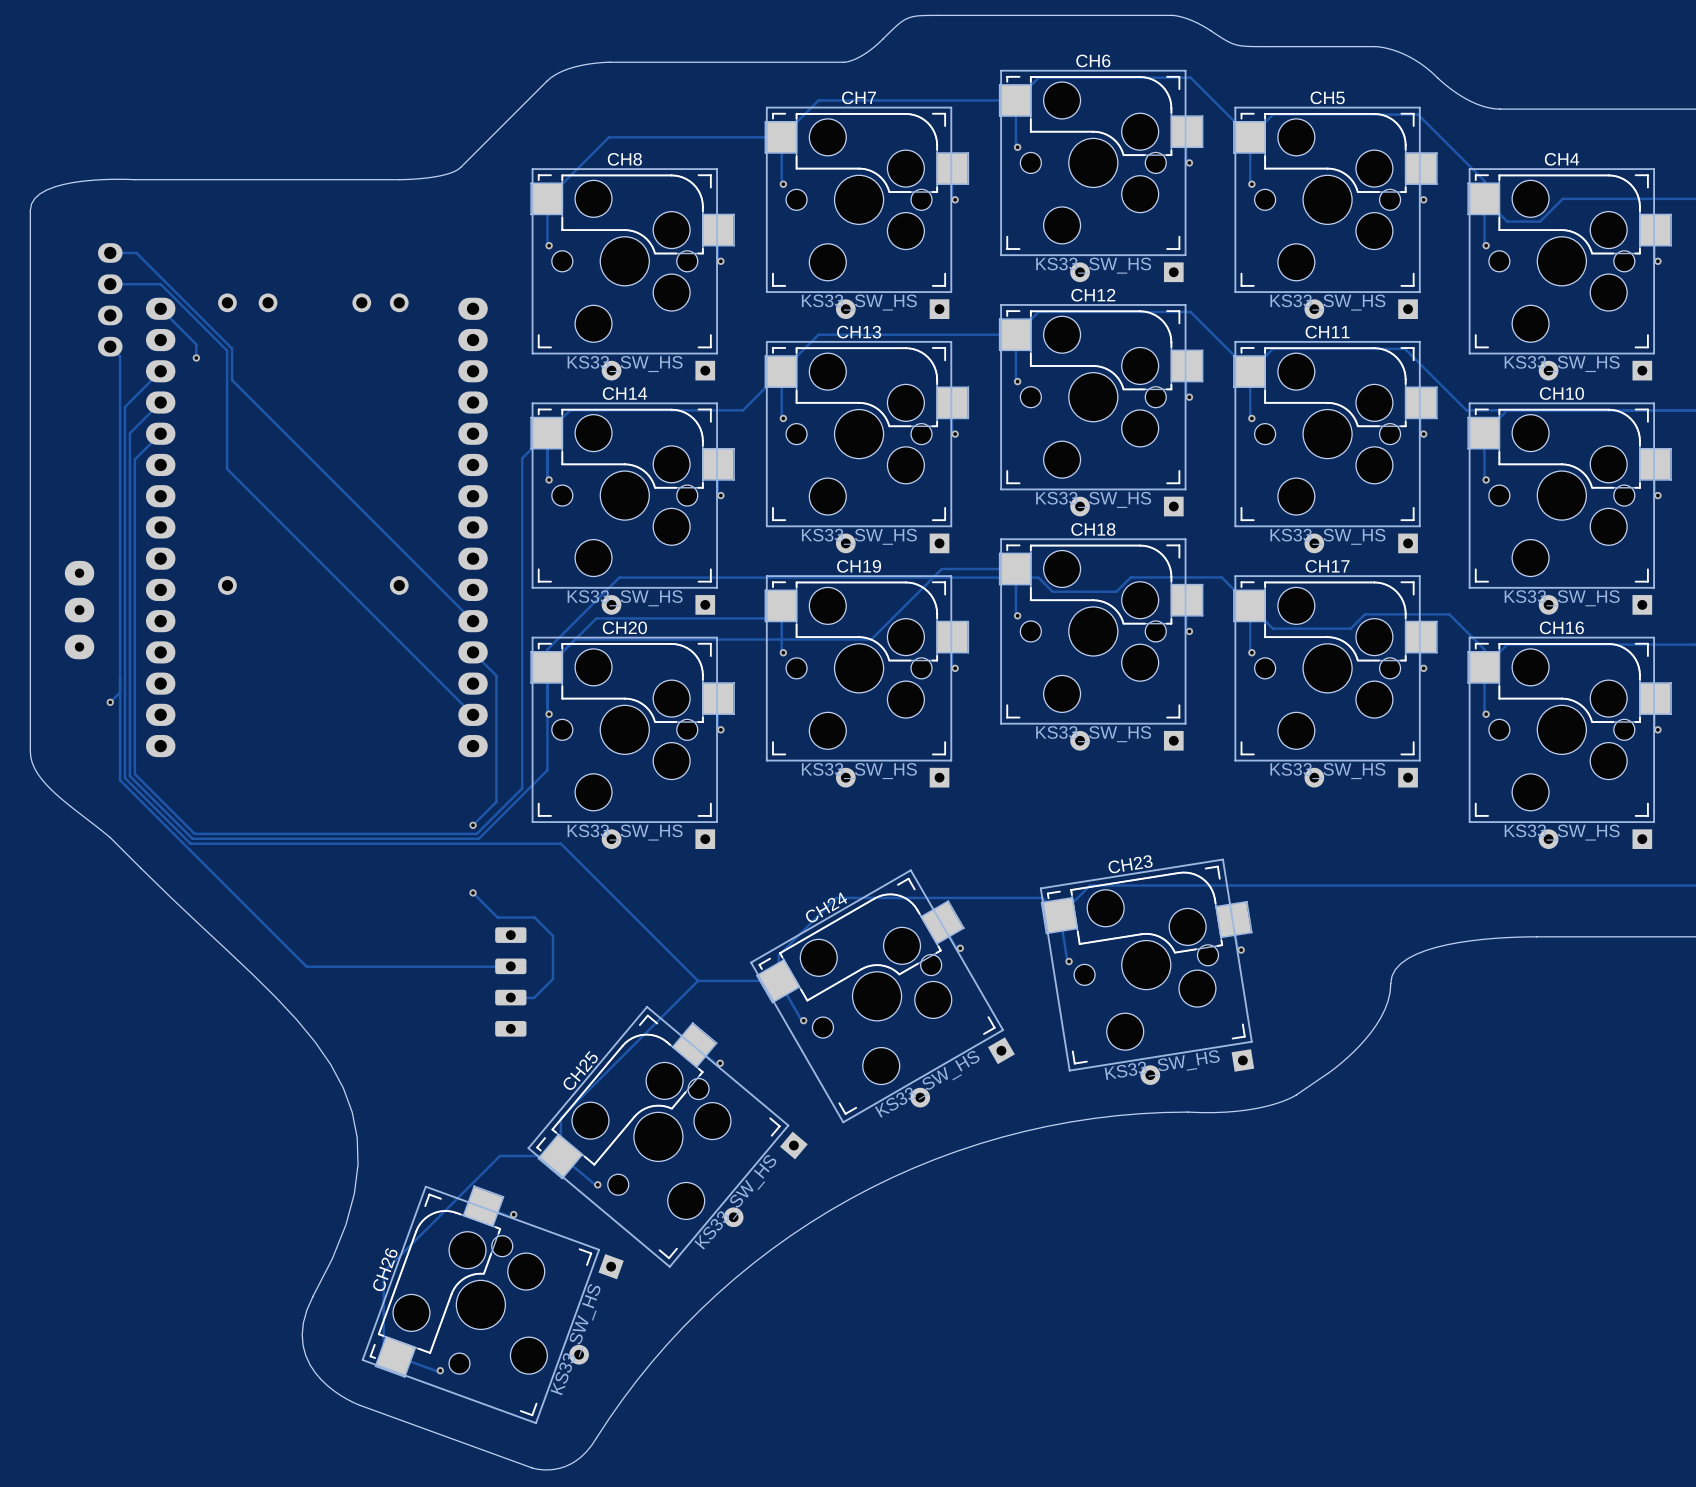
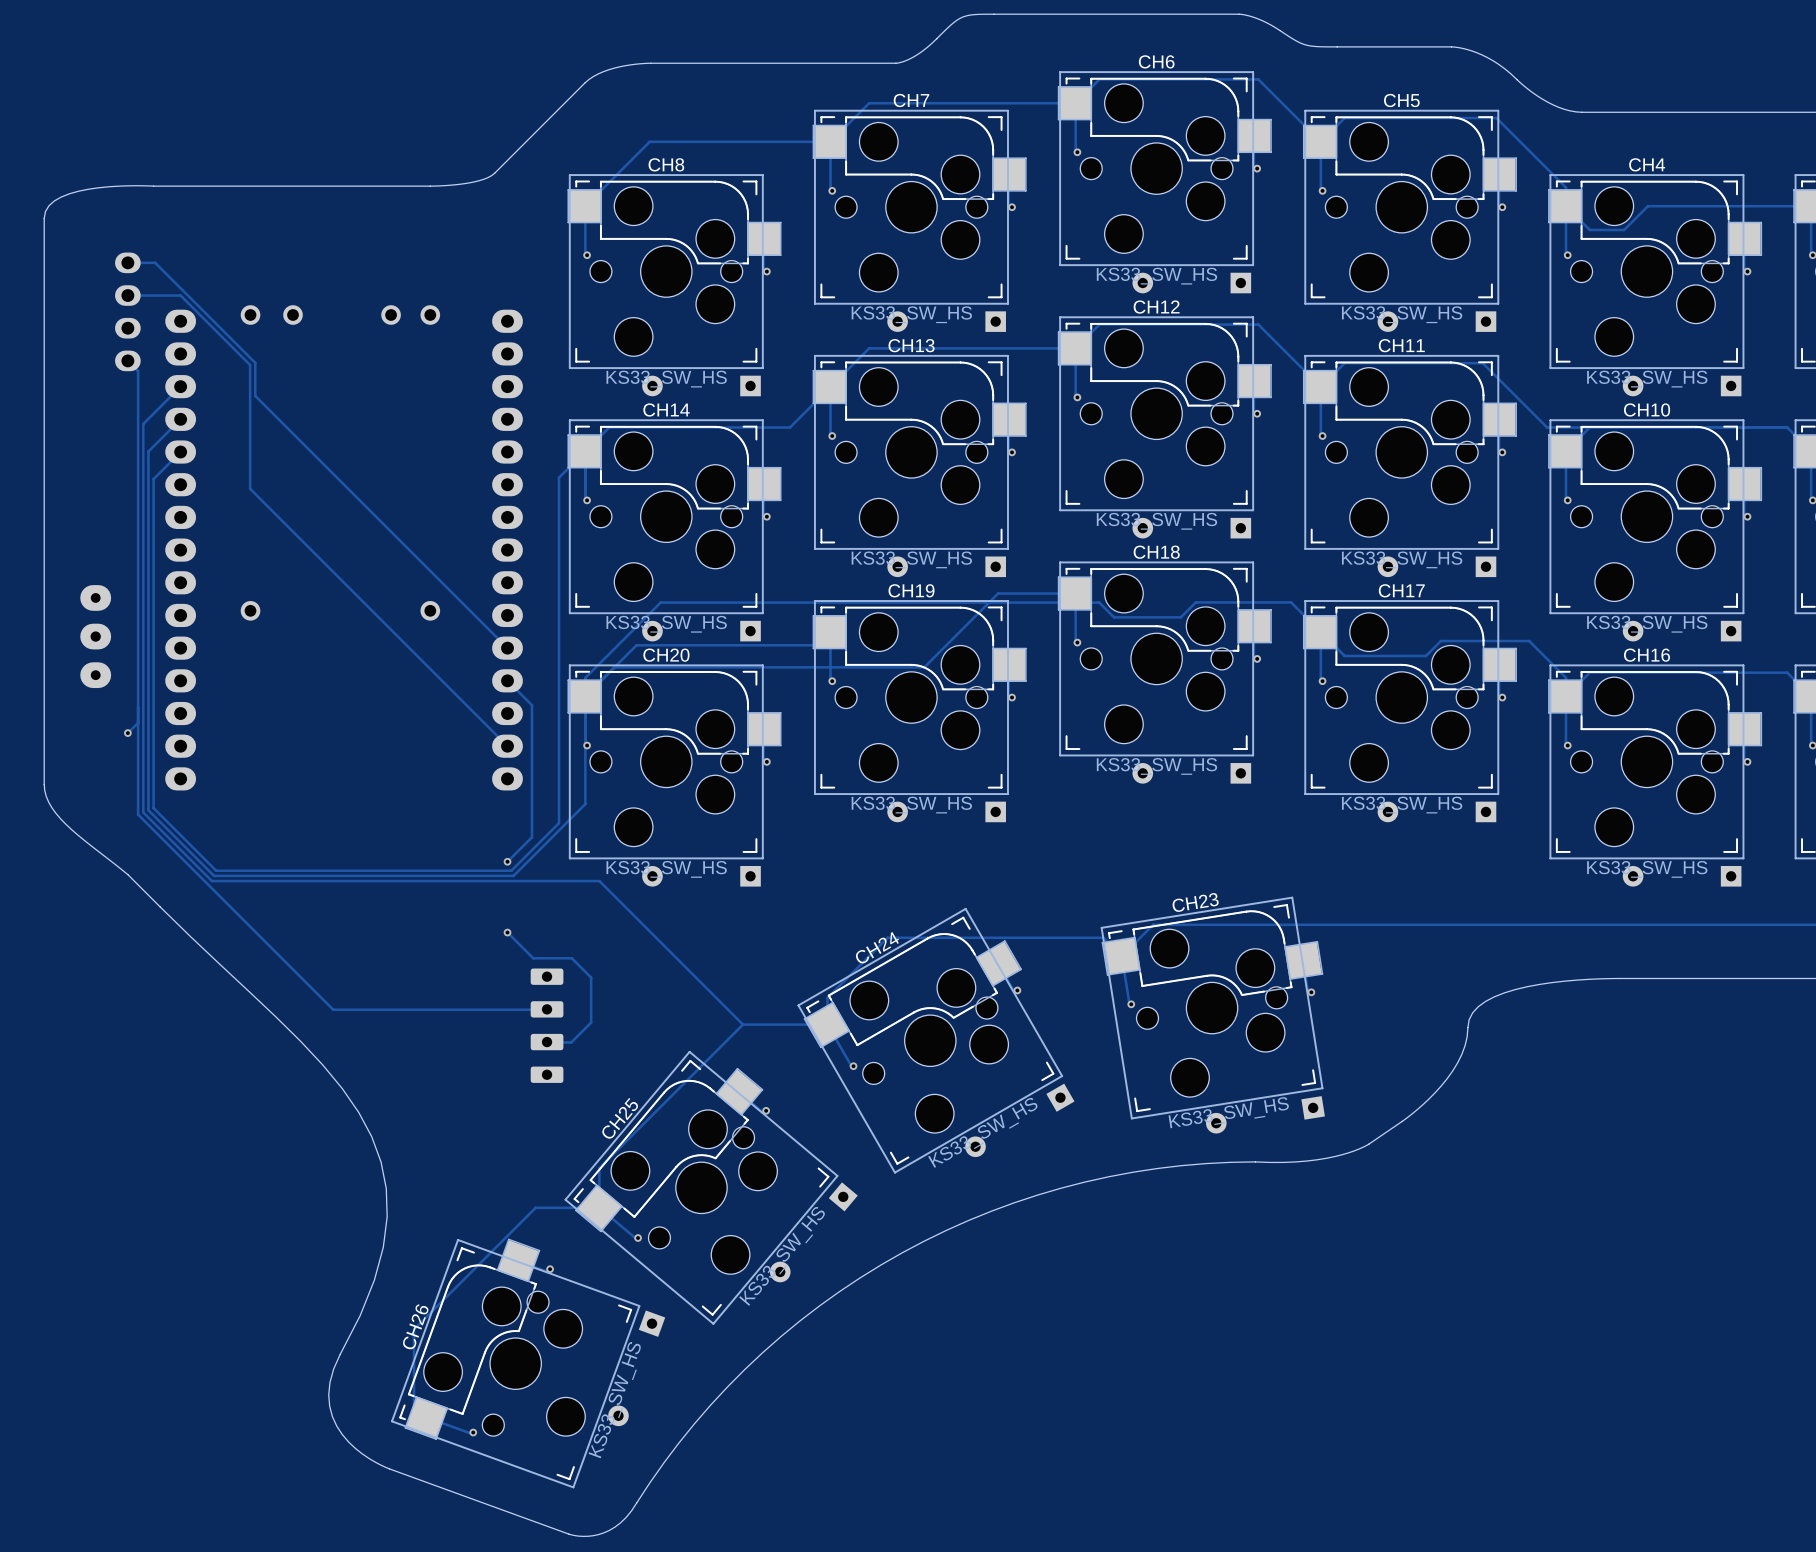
track: (160, 308) (196, 344) (196, 357) -> none
via: (196, 357) -> none

